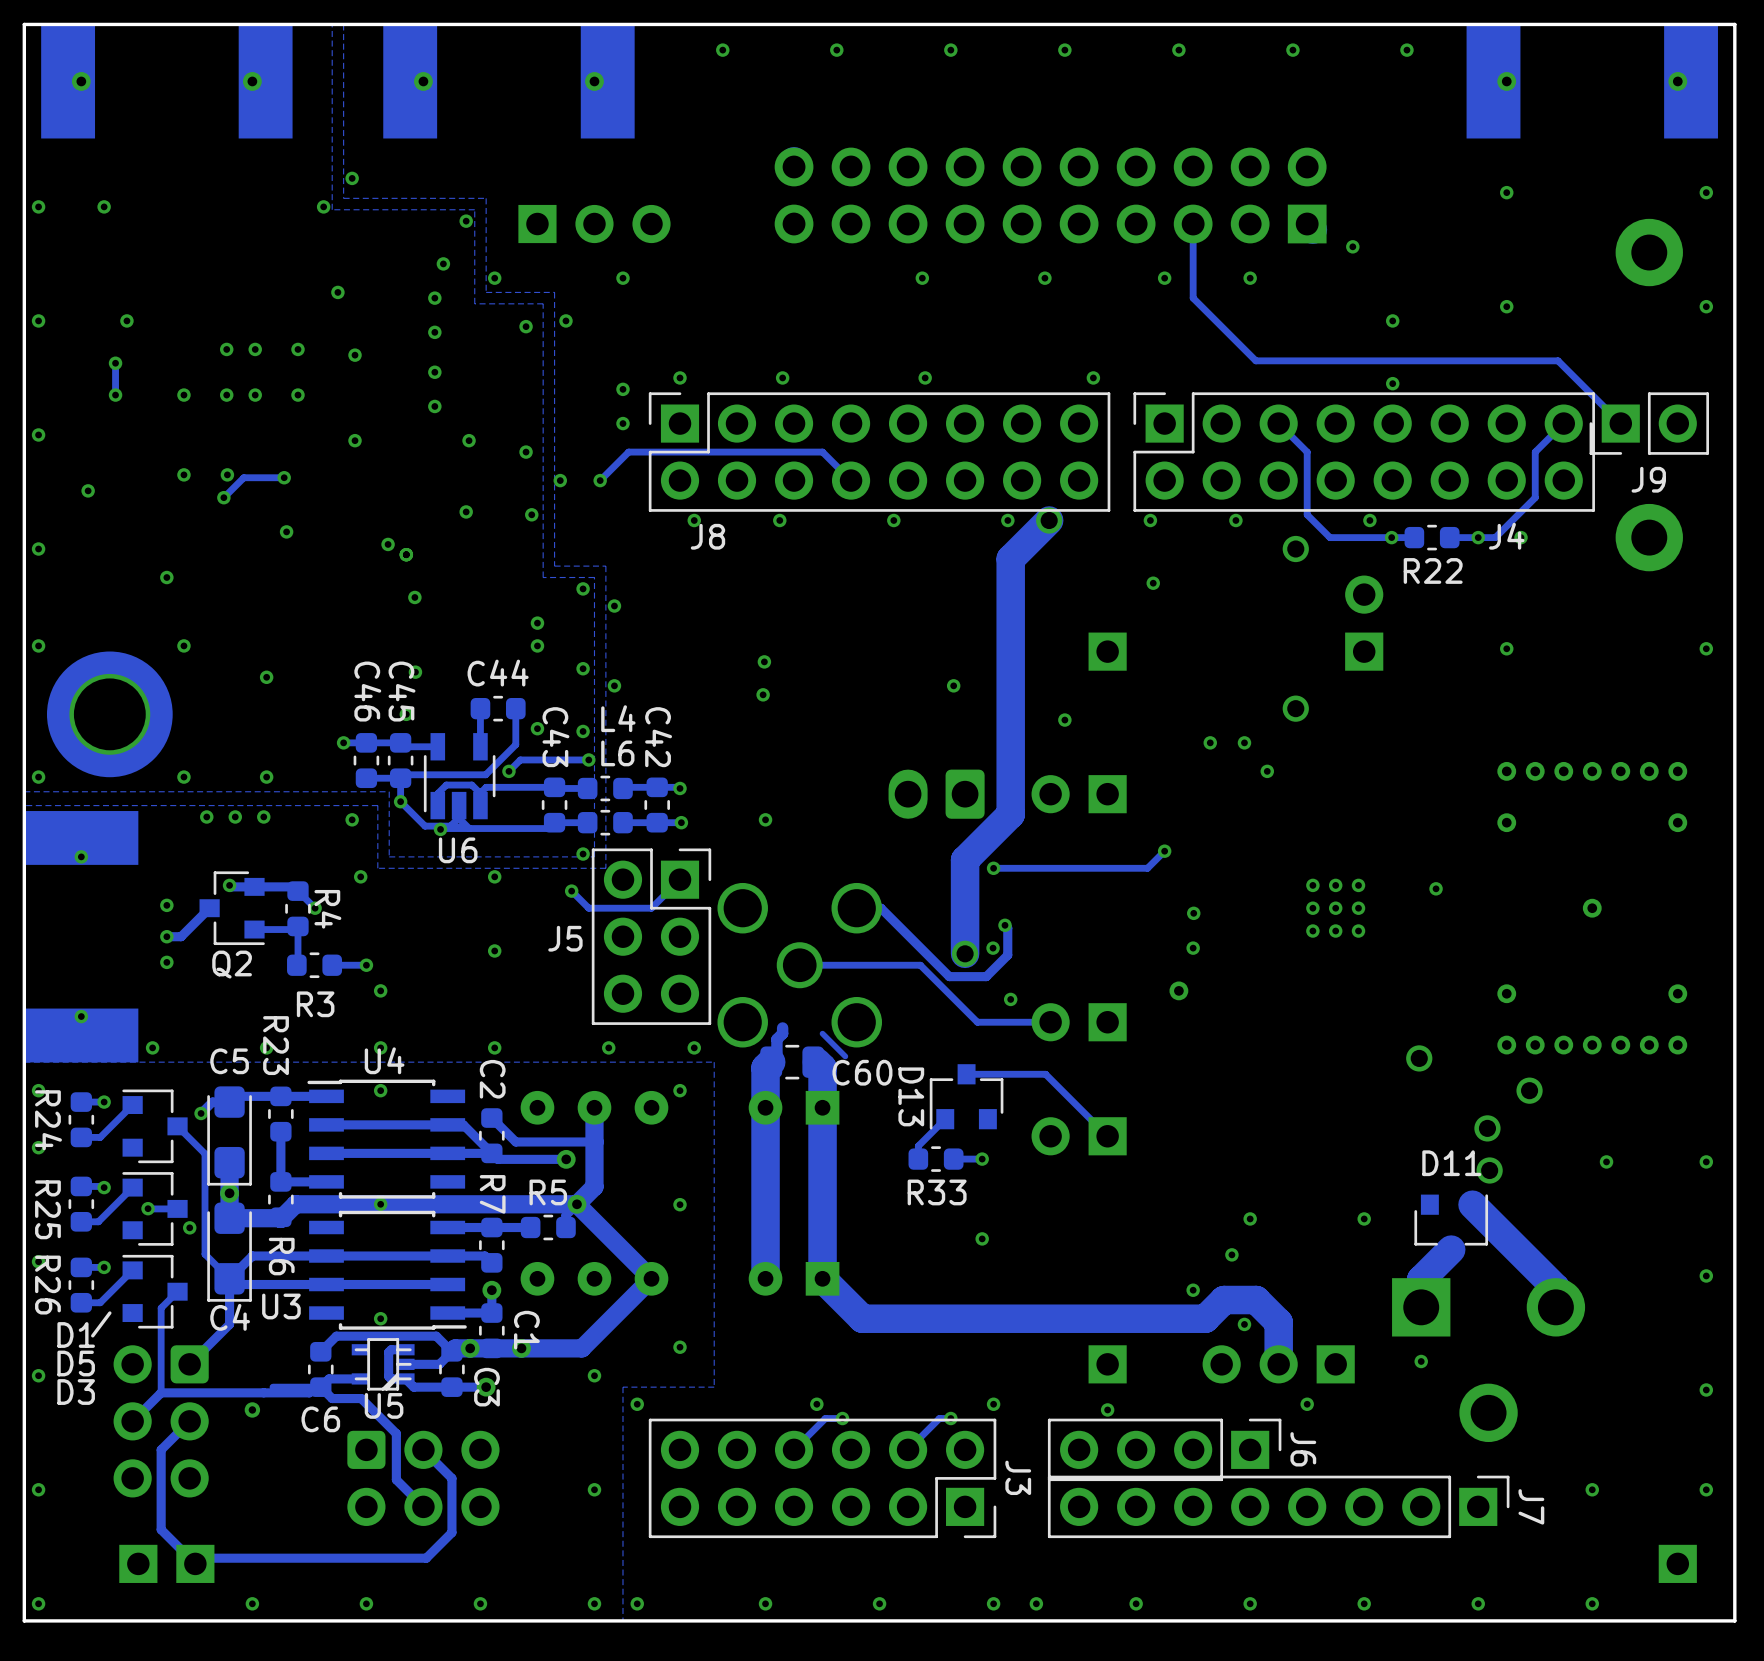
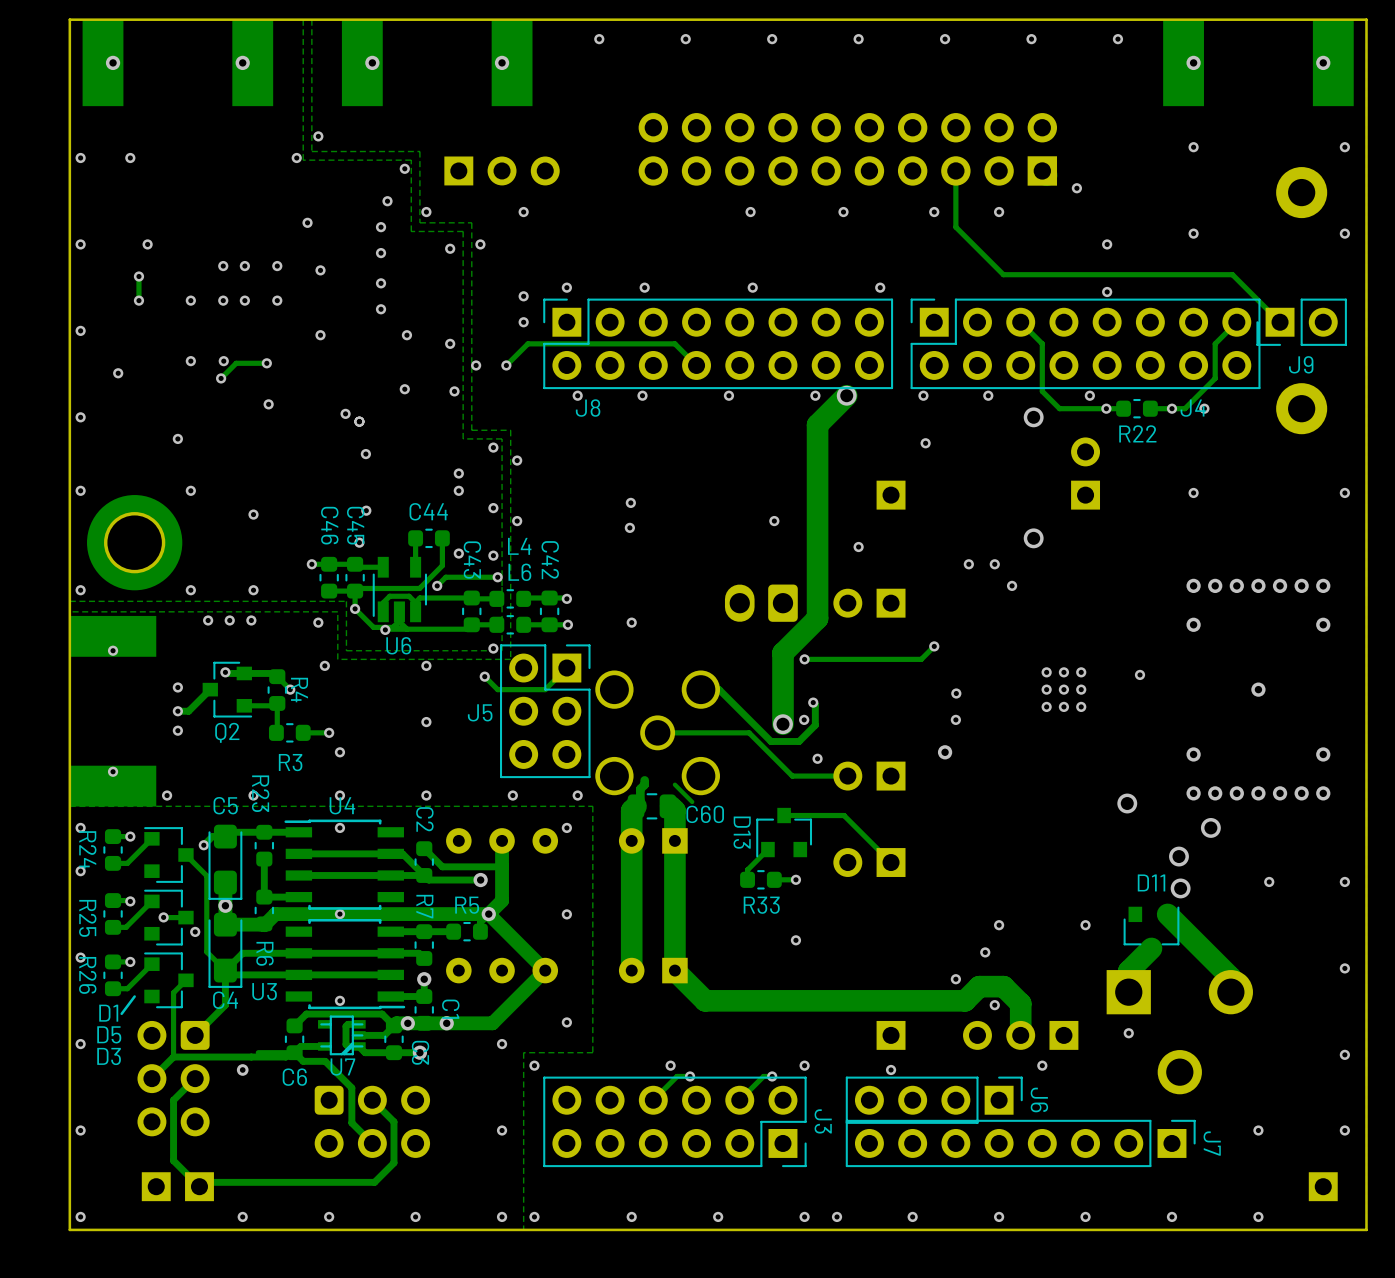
U5 text: none -> U7 (342, 1067)
U5 name: U5 (384, 1405) -> none

